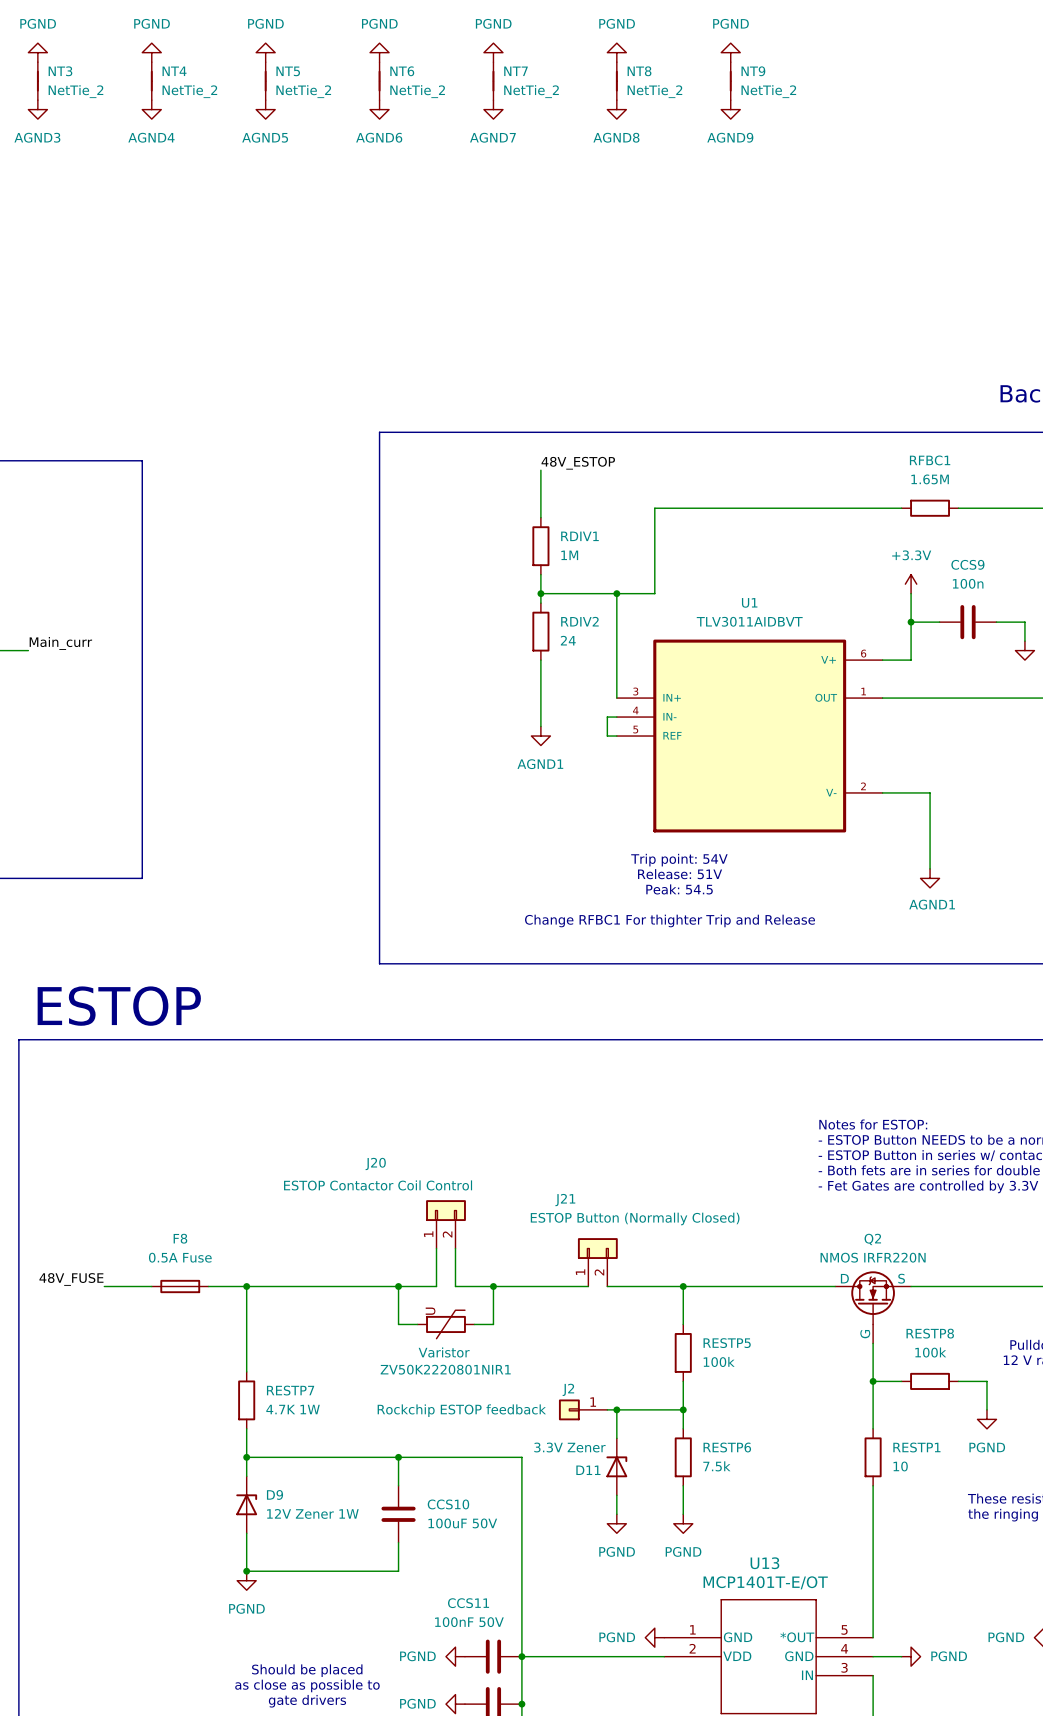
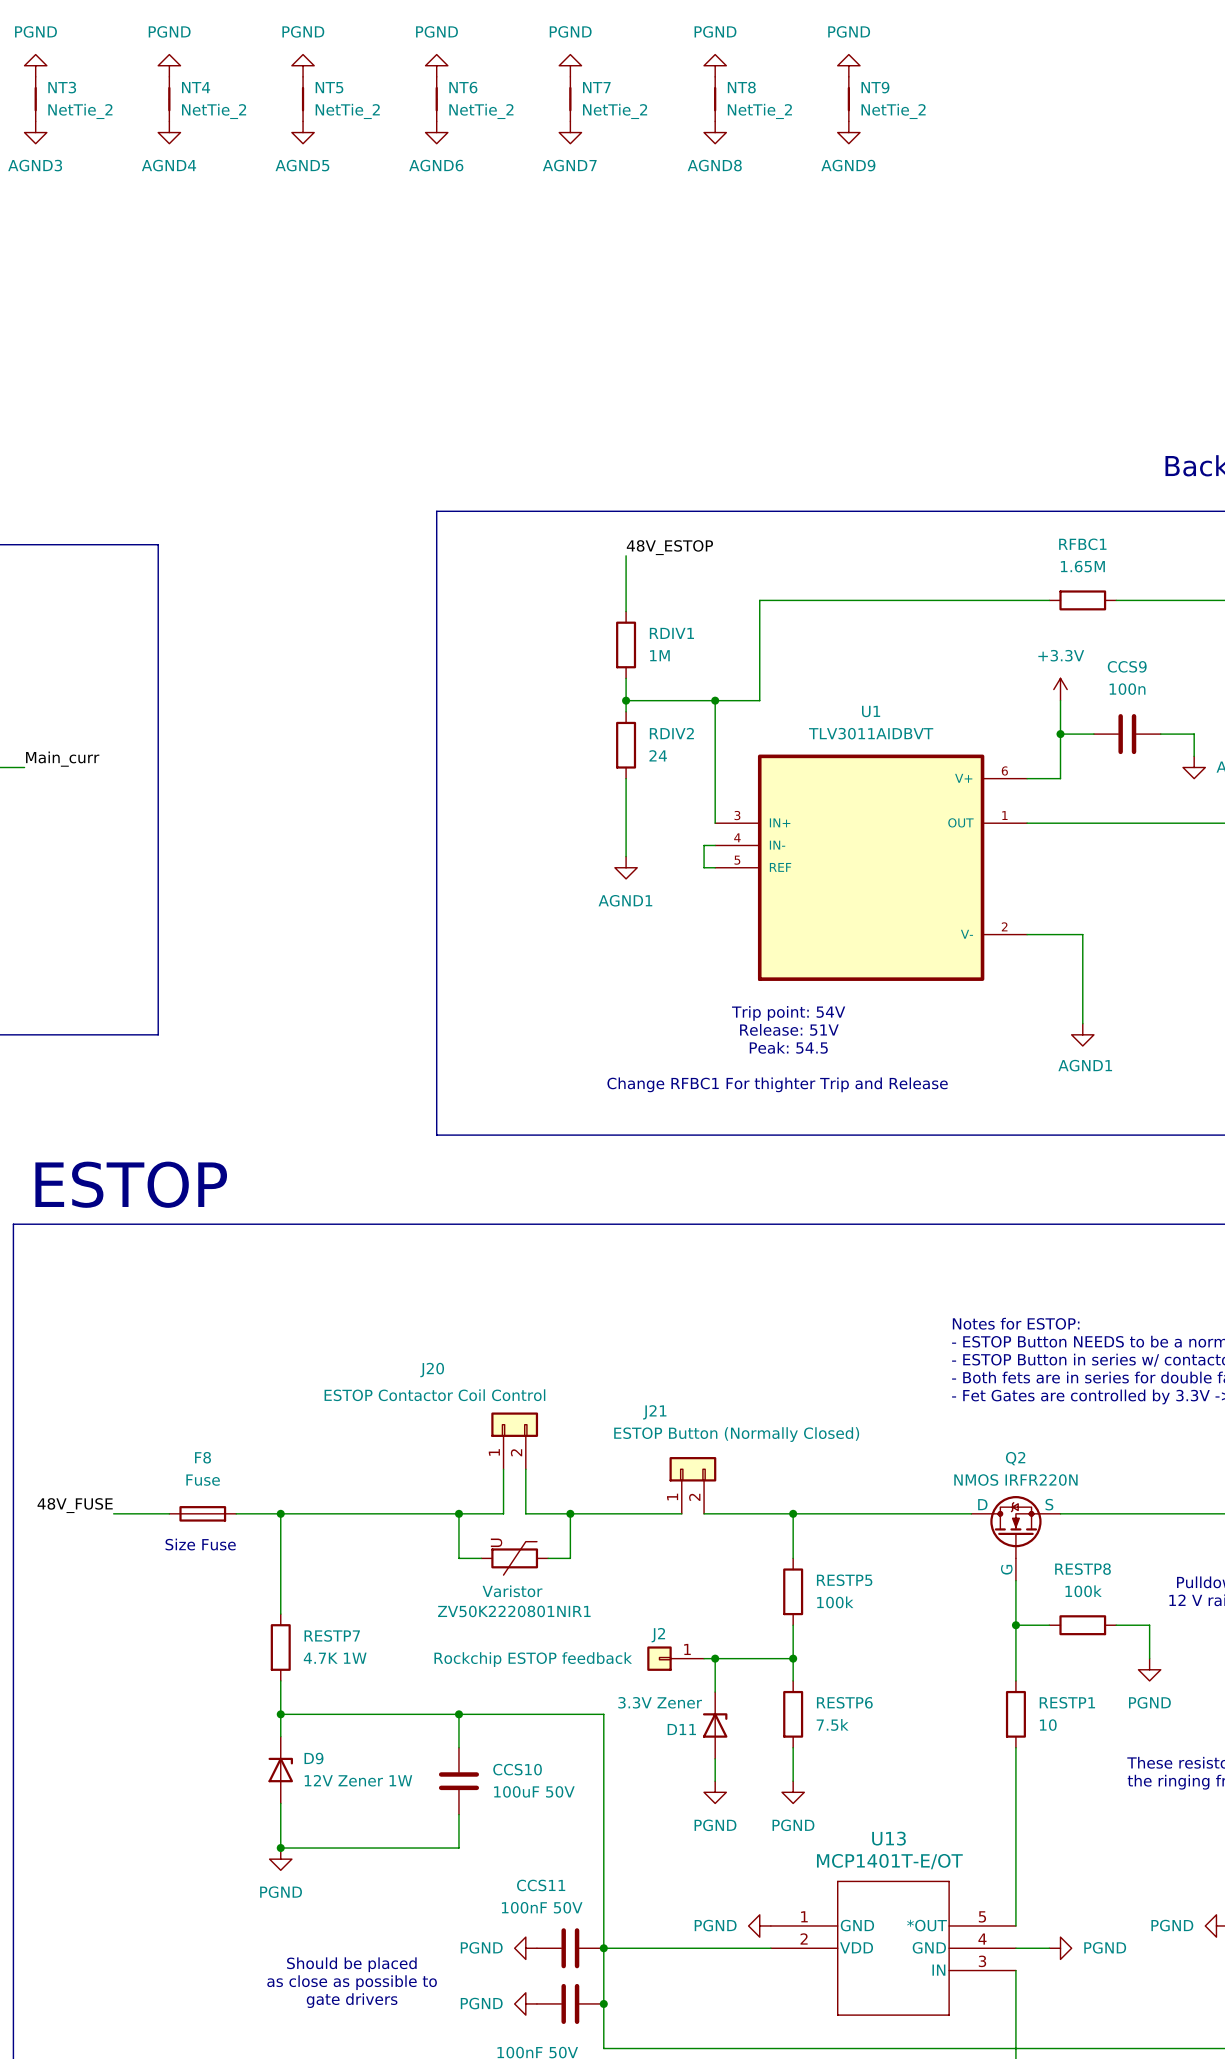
F8 value: 0.5A Fuse (180, 1257) -> Fuse (203, 1480)
text: none -> Size Fuse (200, 1544)

